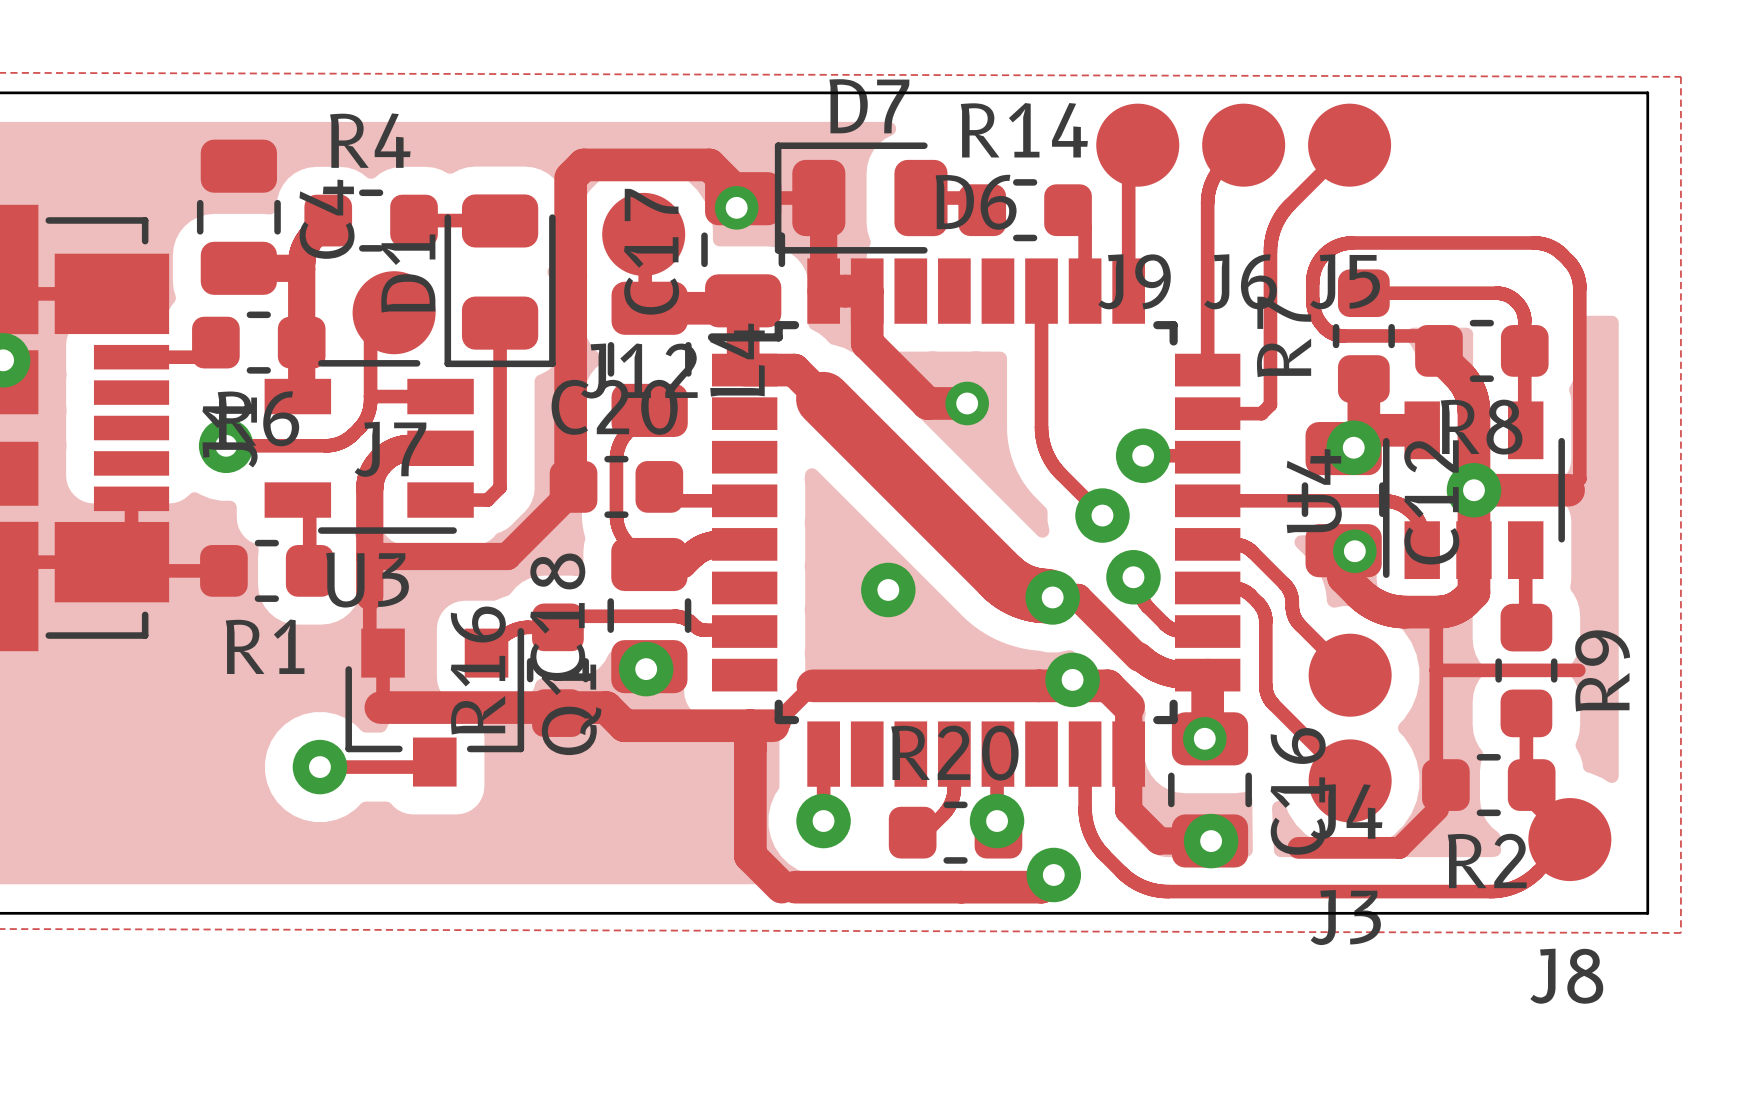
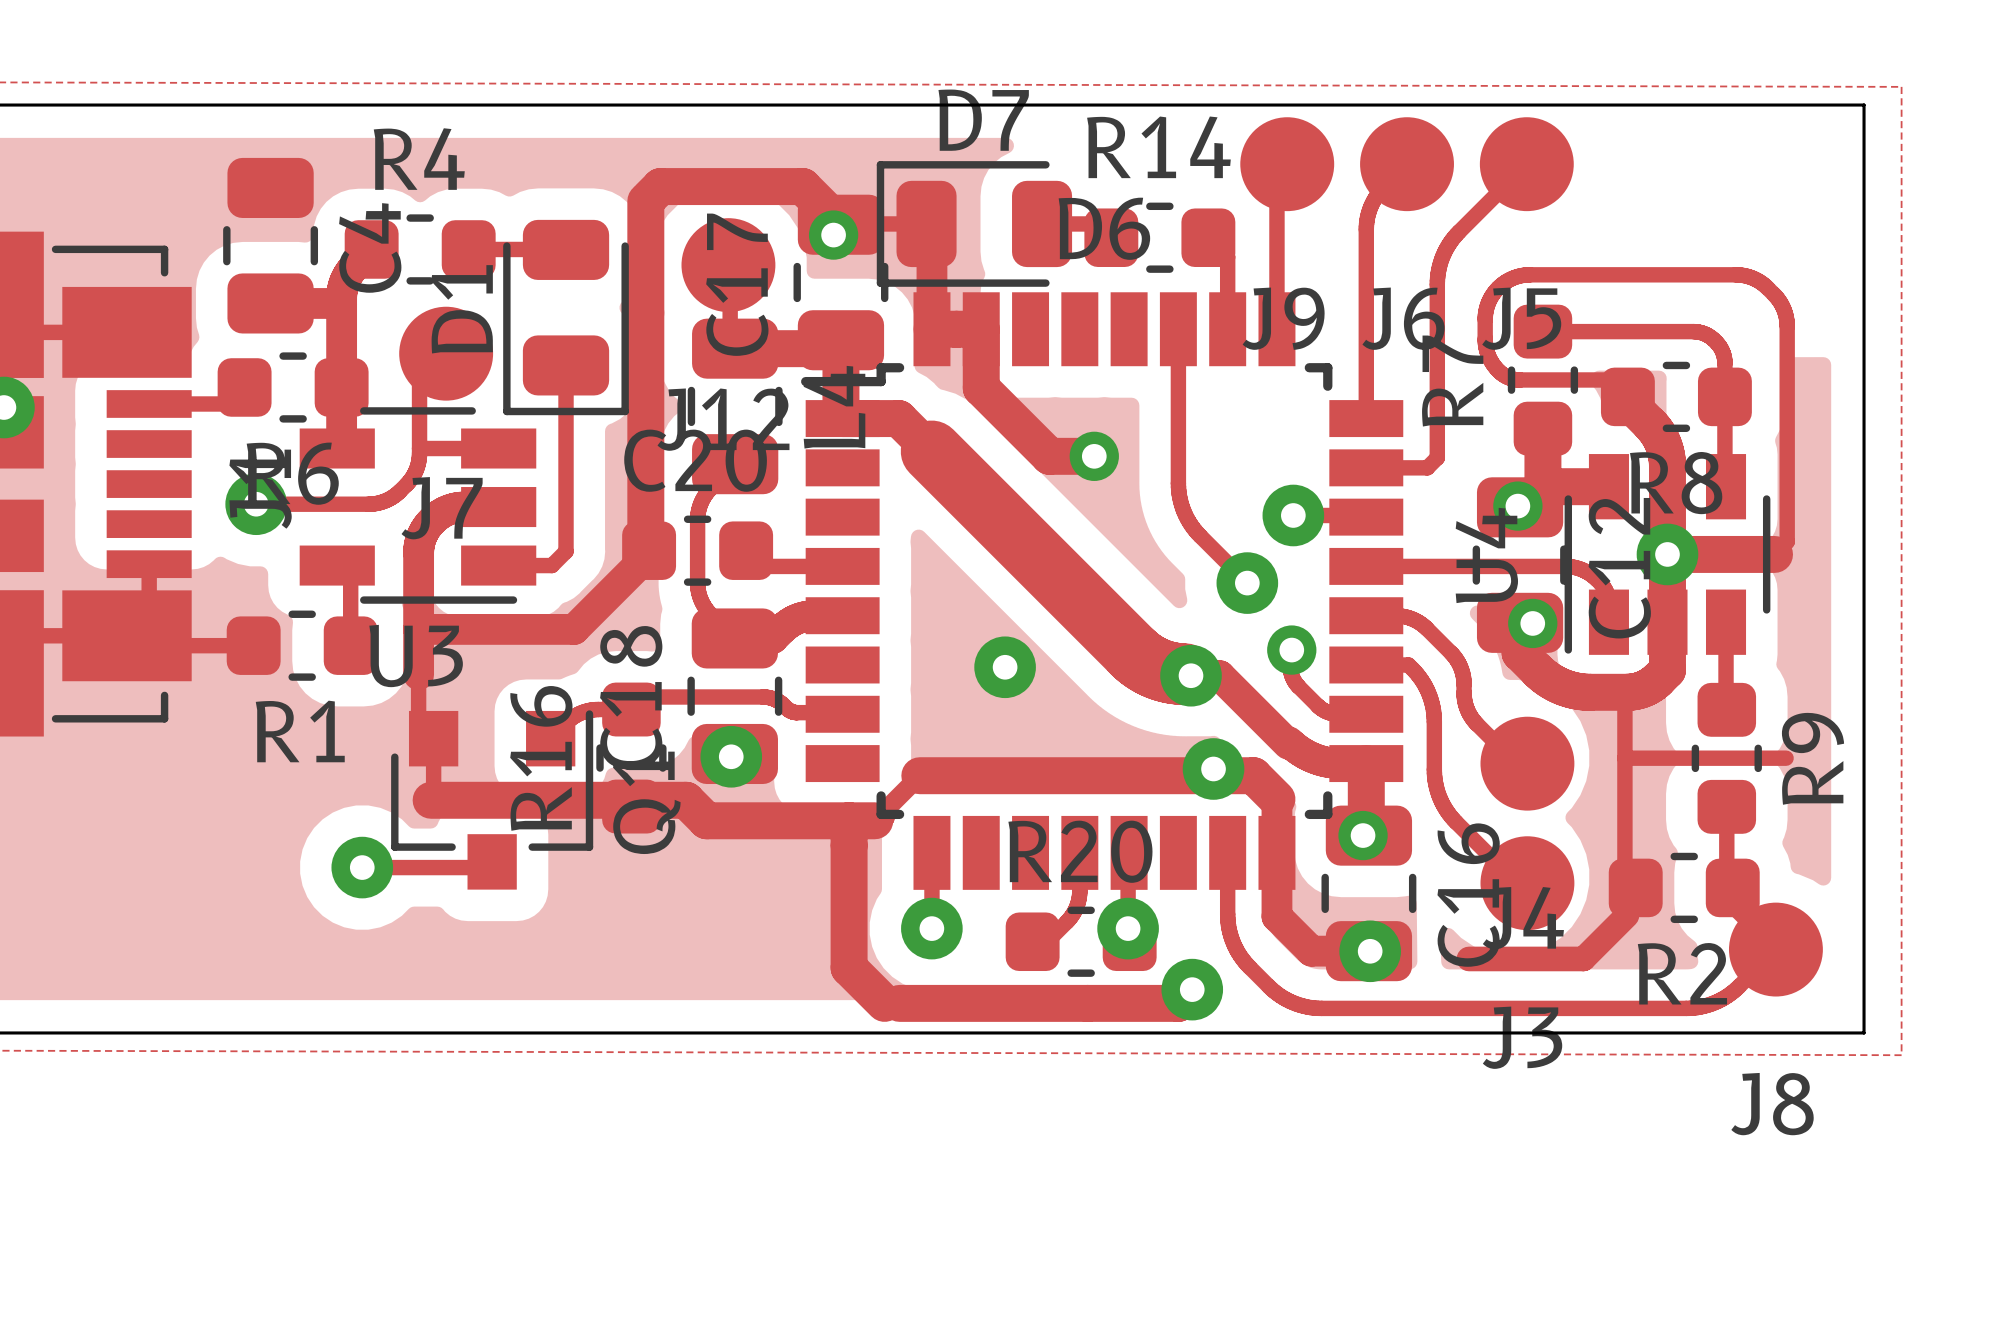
via size: [1326, 420, 1381, 475] -> [1493, 481, 1543, 531]
track: (1236, 544) (1250, 550) (1285, 584) (1291, 594) (1293, 612) (1297, 622) (1350, 675) -> (1399, 615) (1410, 618) (1422, 624) (1453, 656) (1462, 673) (1464, 699) (1469, 713) (1475, 722) (1511, 758)
via size: [1106, 550, 1161, 605] -> [1267, 625, 1317, 675]
track: (1232, 587) (1248, 593) (1259, 604) (1264, 612) (1265, 686) (1269, 699) (1350, 780) -> (1394, 664) (1408, 664) (1421, 680) (1429, 696) (1434, 717) (1434, 776) (1443, 804) (1453, 819) (1511, 877)

